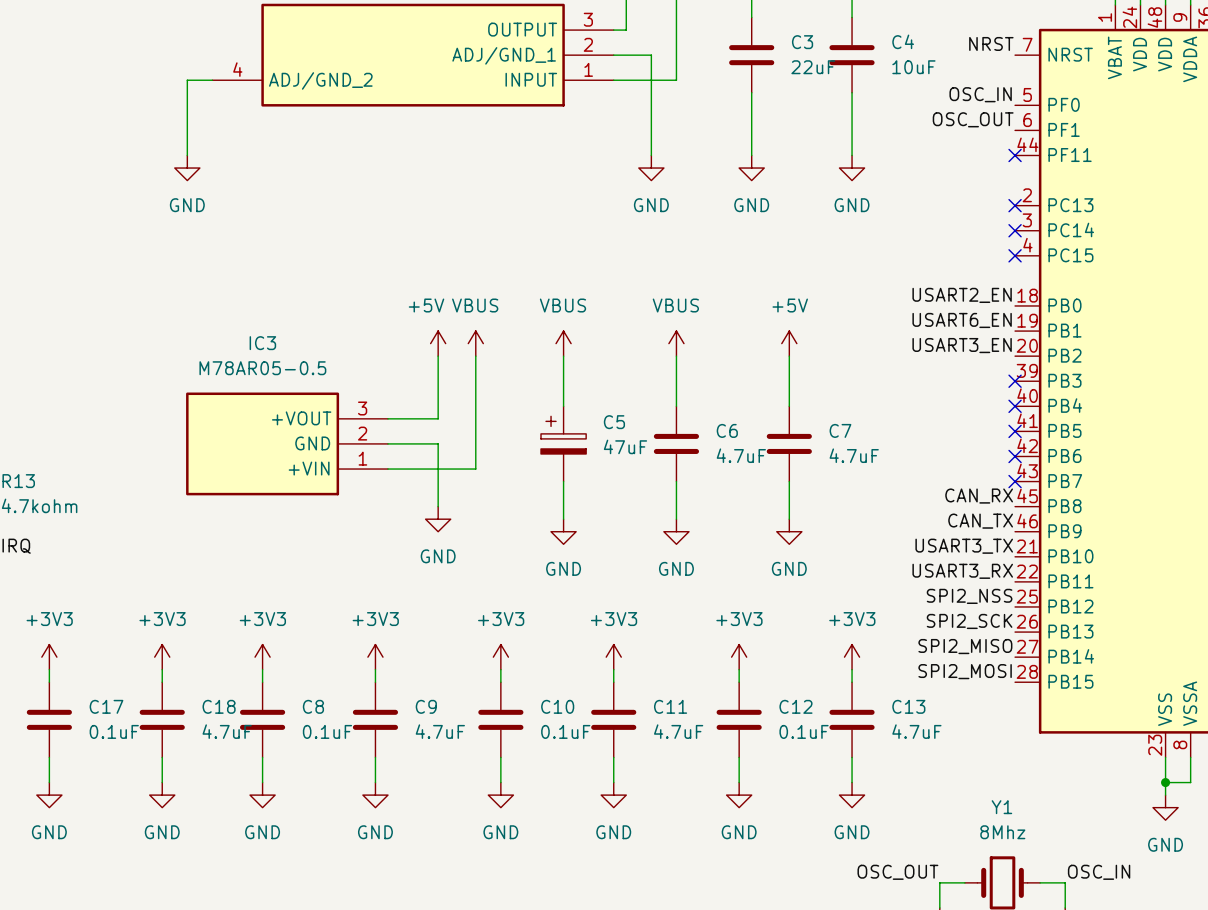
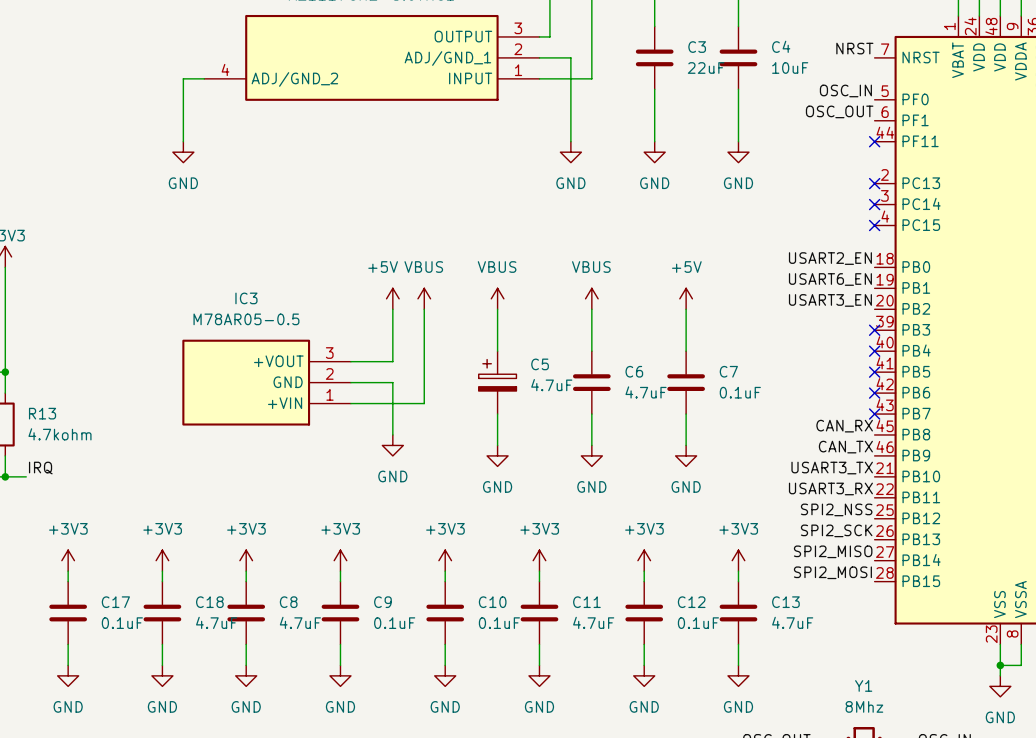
C5 value: 47uF (625, 446) -> 4.7uF (551, 385)
C7 value: 4.7uF (854, 455) -> 0.1uF (740, 392)
C8 value: 0.1uF (327, 731) -> 4.7uF (300, 622)
C9 value: 4.7uF (440, 731) -> 0.1uF (394, 623)

